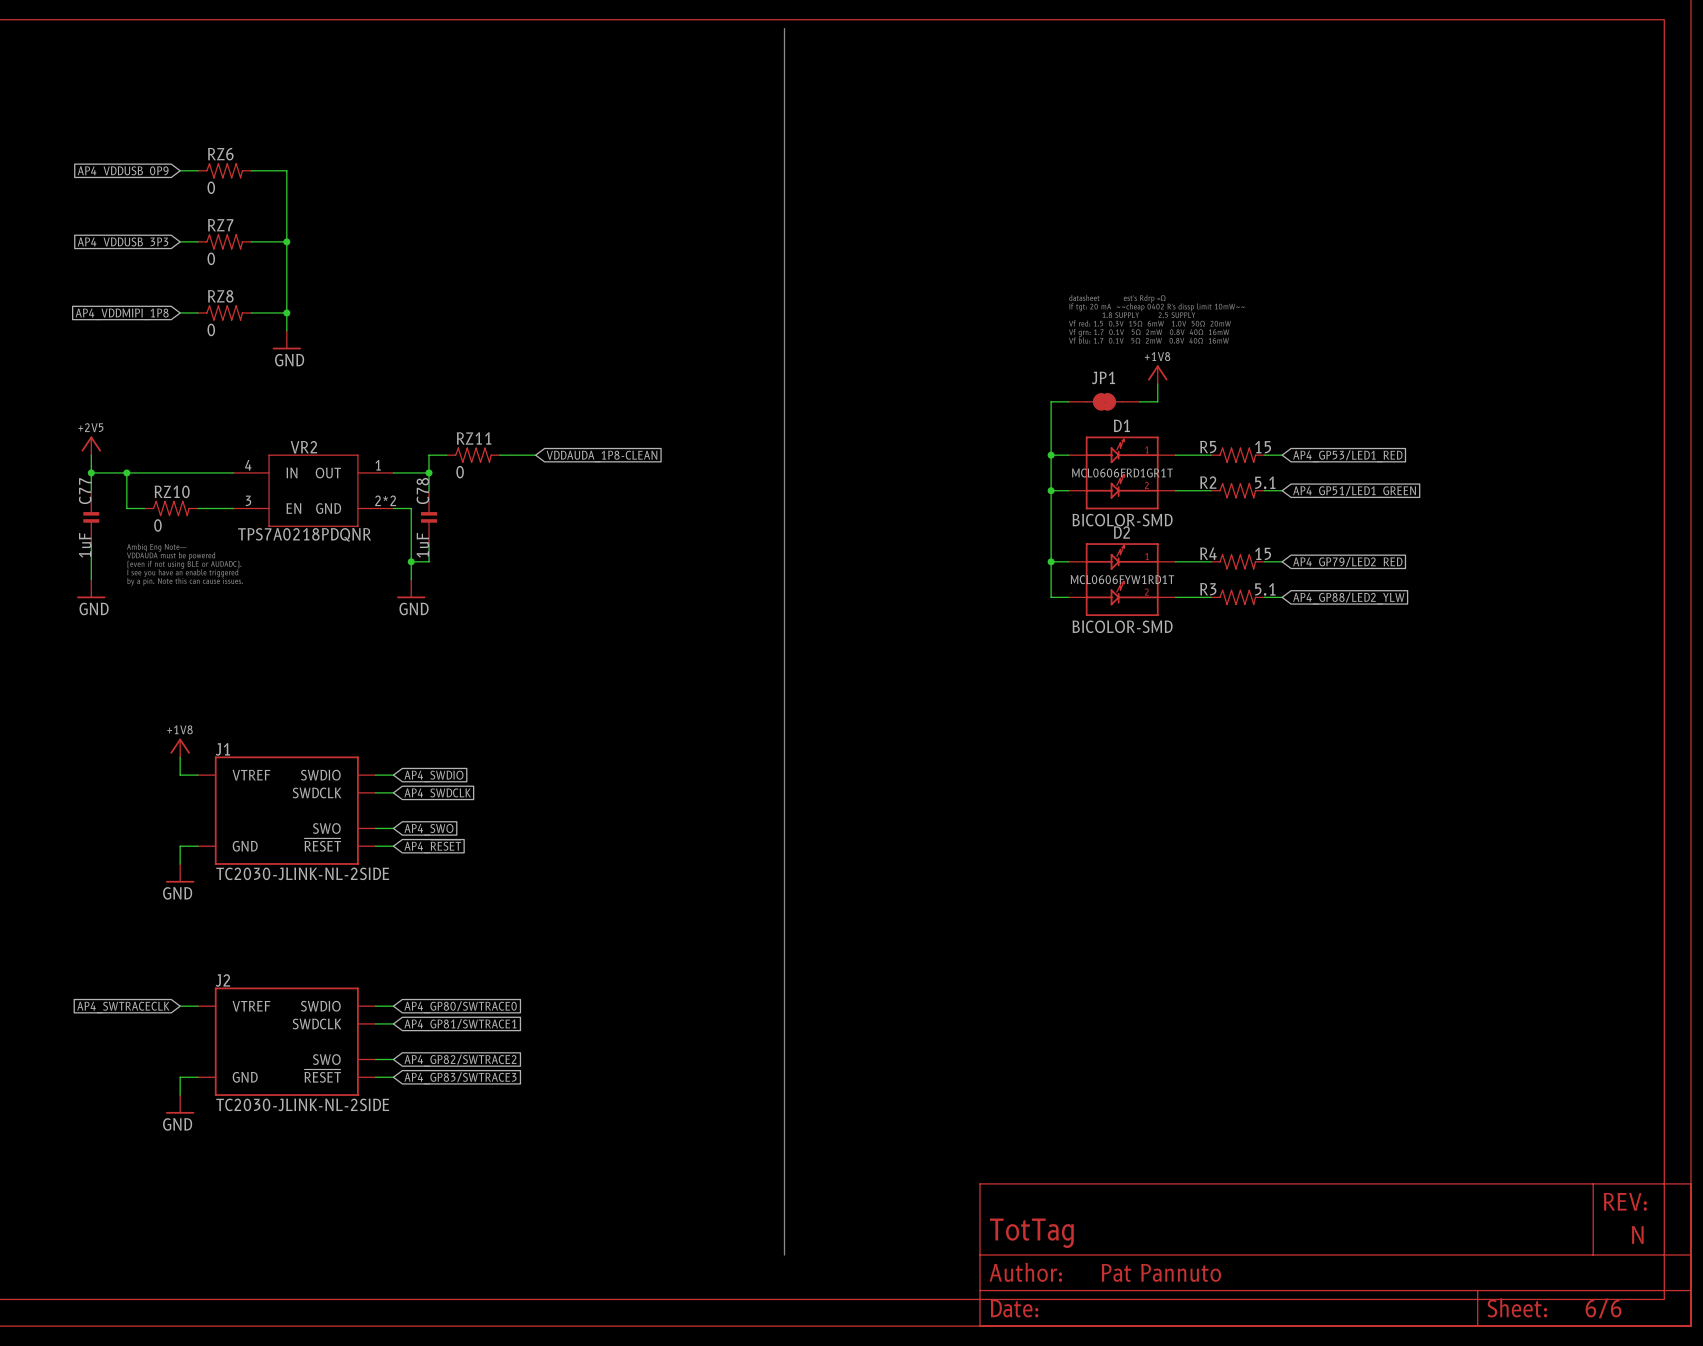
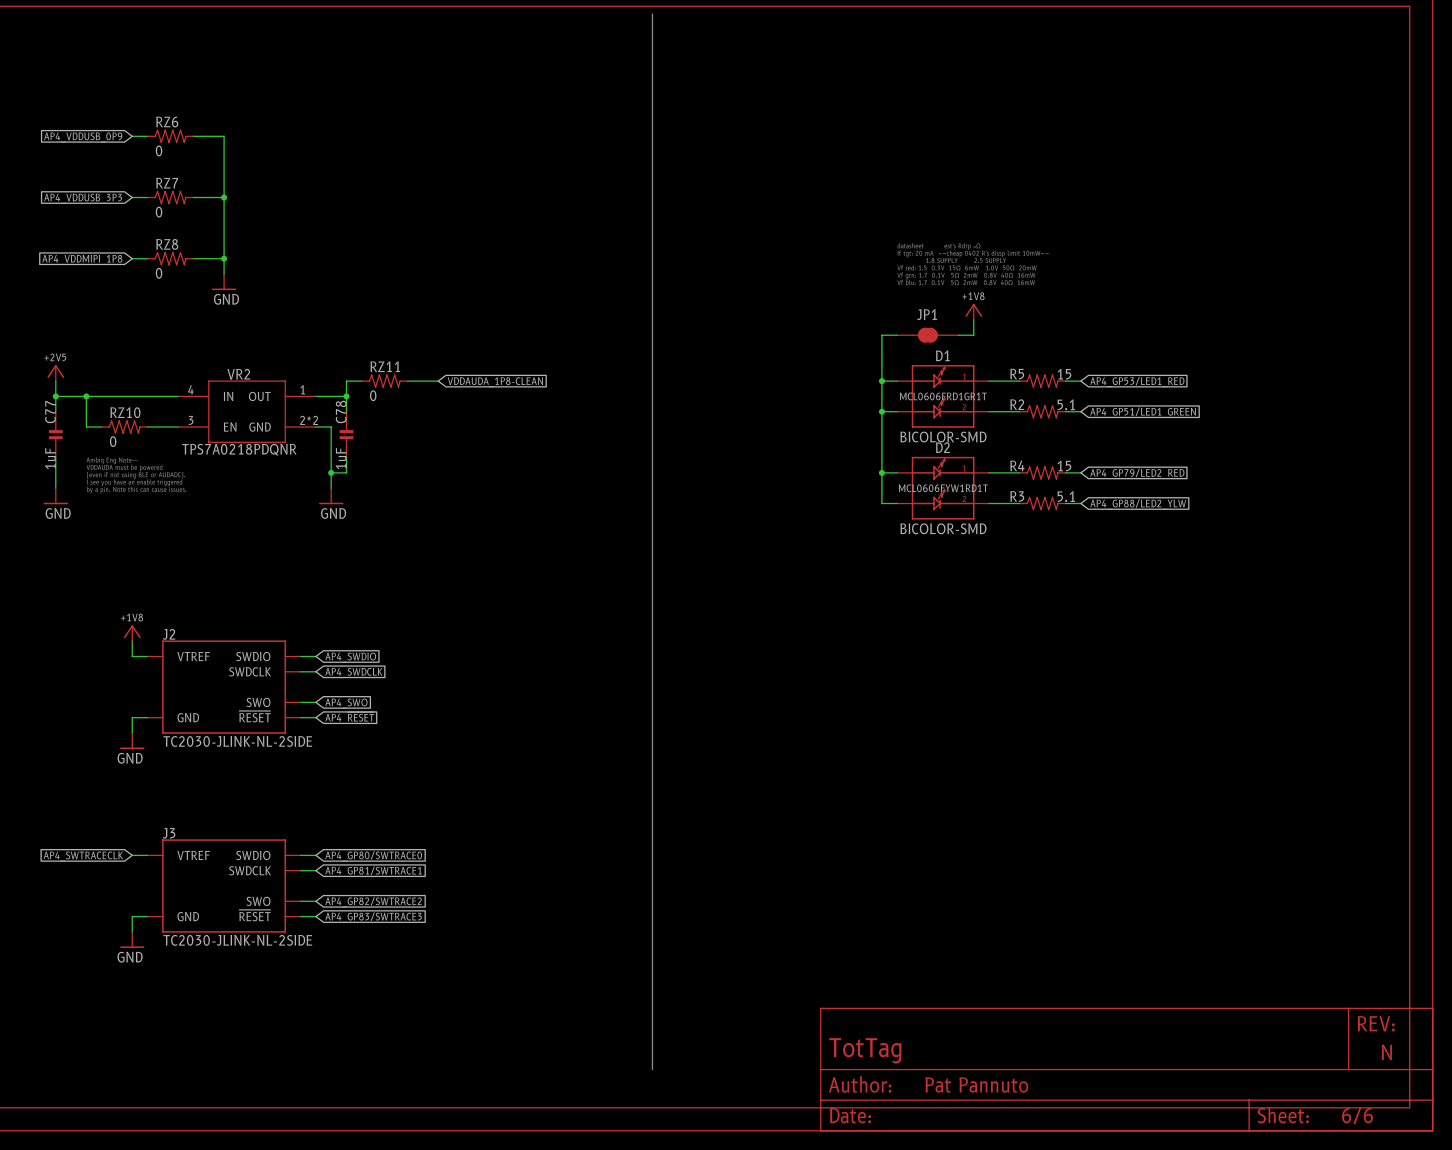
J1 name: J1 (222, 749) -> J2 (169, 634)
J2 name: J2 (222, 980) -> J3 (169, 833)

